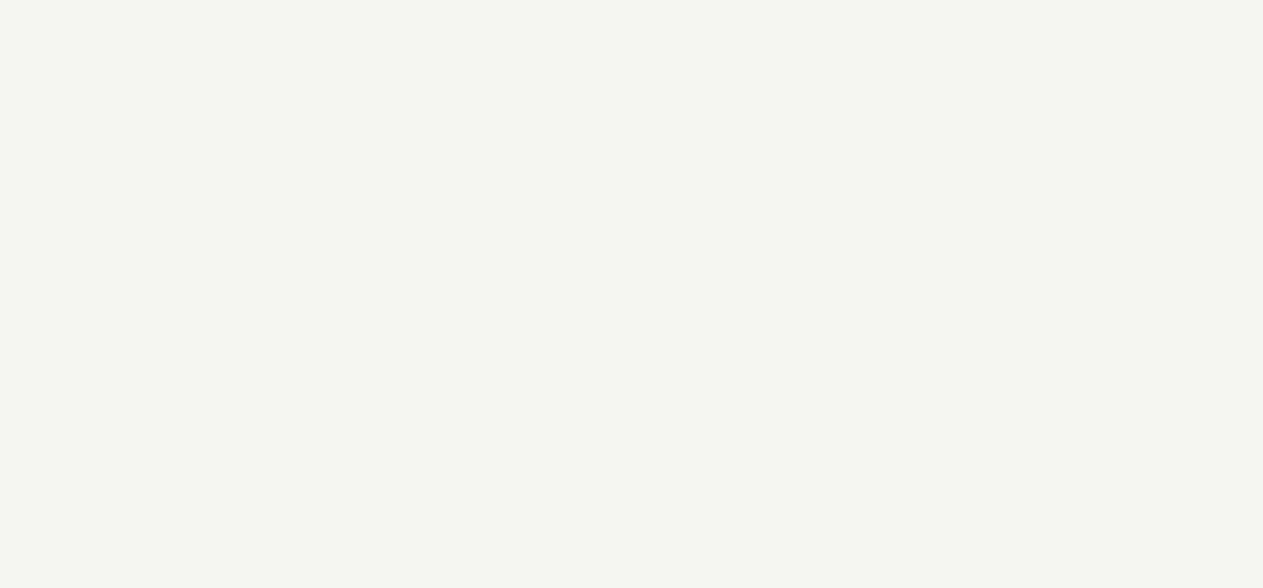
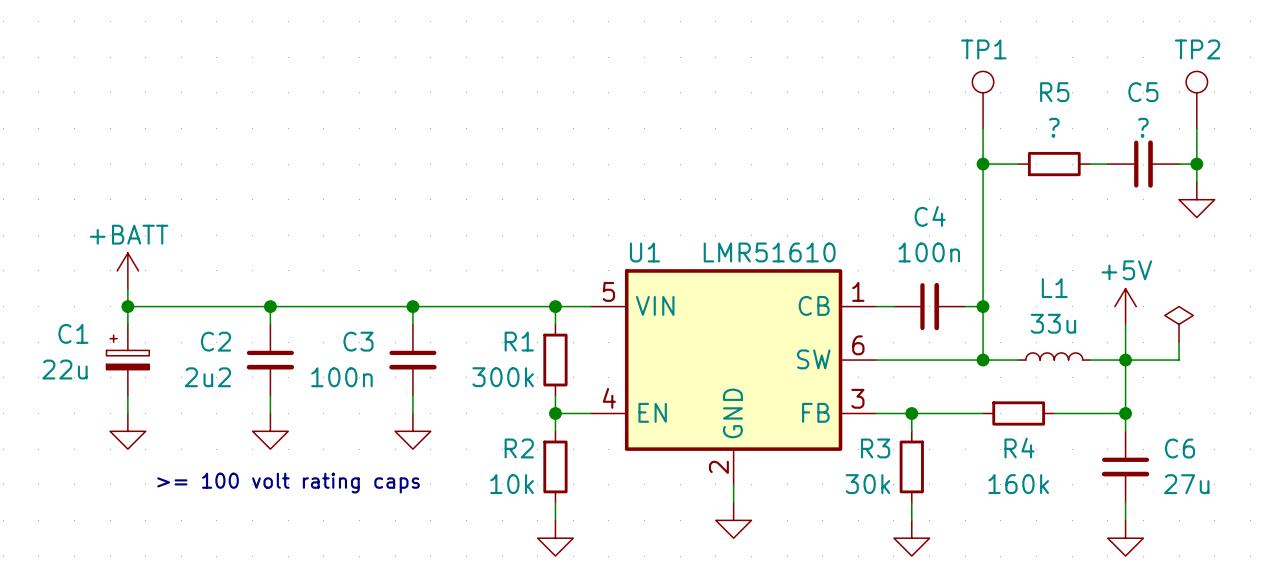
TP1: none -> (983, 99)
TP2: none -> (1196, 99)
wire: none -> (983, 128) (983, 360)
wire: none -> (1196, 128) (1196, 181)
wire: none -> (983, 164) (1018, 164)
junction: none -> (983, 164)
R5: none -> ? (1054, 164)
wire: none -> (1089, 164) (1107, 164)
C5: none -> ? (1143, 164)
wire: none -> (1179, 164) (1196, 164)
junction: none -> (1196, 164)
power symbol: none -> (1196, 199)
power symbol: none -> +BATT (127, 270)
wire: none -> (127, 288) (127, 324)
wire: none -> (127, 306) (591, 306)
junction: none -> (127, 306)
wire: none -> (270, 306) (270, 324)
junction: none -> (270, 306)
wire: none -> (412, 306) (412, 324)
junction: none -> (412, 306)
wire: none -> (555, 306) (555, 324)
junction: none -> (555, 306)
wire: none -> (876, 306) (893, 306)
C4: none -> 100n (929, 306)
wire: none -> (965, 306) (983, 306)
junction: none -> (983, 306)
power symbol: none -> +5V (1125, 306)
wire: none -> (1125, 324) (1125, 431)
power symbol: none -> (1179, 324)
wire: none -> (1179, 342) (1179, 360) (1089, 360)
L1: none -> 33u (1054, 356)
C1: none -> 22u (127, 360)
C2: none -> 2u2 (270, 360)
C3: none -> 100n (412, 360)
R1: none -> 300k (555, 360)
wire: none -> (876, 360) (1018, 360)
junction: none -> (983, 360)
junction: none -> (1125, 360)
U1: none -> LMR51610 (733, 376)
wire: none -> (127, 395) (127, 413)
wire: none -> (270, 395) (270, 413)
wire: none -> (412, 395) (412, 413)
wire: none -> (555, 395) (555, 431)
wire: none -> (555, 413) (591, 413)
junction: none -> (555, 413)
wire: none -> (876, 413) (983, 413)
wire: none -> (911, 413) (911, 431)
junction: none -> (911, 413)
R4: none -> 160k (1018, 413)
wire: none -> (1054, 413) (1125, 413)
junction: none -> (1125, 413)
power symbol: none -> (127, 431)
power symbol: none -> (270, 431)
power symbol: none -> (412, 431)
R2: none -> 10k (555, 466)
R3: none -> 30k (911, 466)
C6: none -> 27u (1125, 466)
text: none -> >= 100 volt rating caps (288, 483)
wire: none -> (733, 484) (733, 502)
wire: none -> (555, 502) (555, 520)
wire: none -> (911, 502) (911, 520)
wire: none -> (1125, 502) (1125, 520)
power symbol: none -> (733, 520)
power symbol: none -> (555, 538)
power symbol: none -> (911, 538)
power symbol: none -> (1125, 538)

